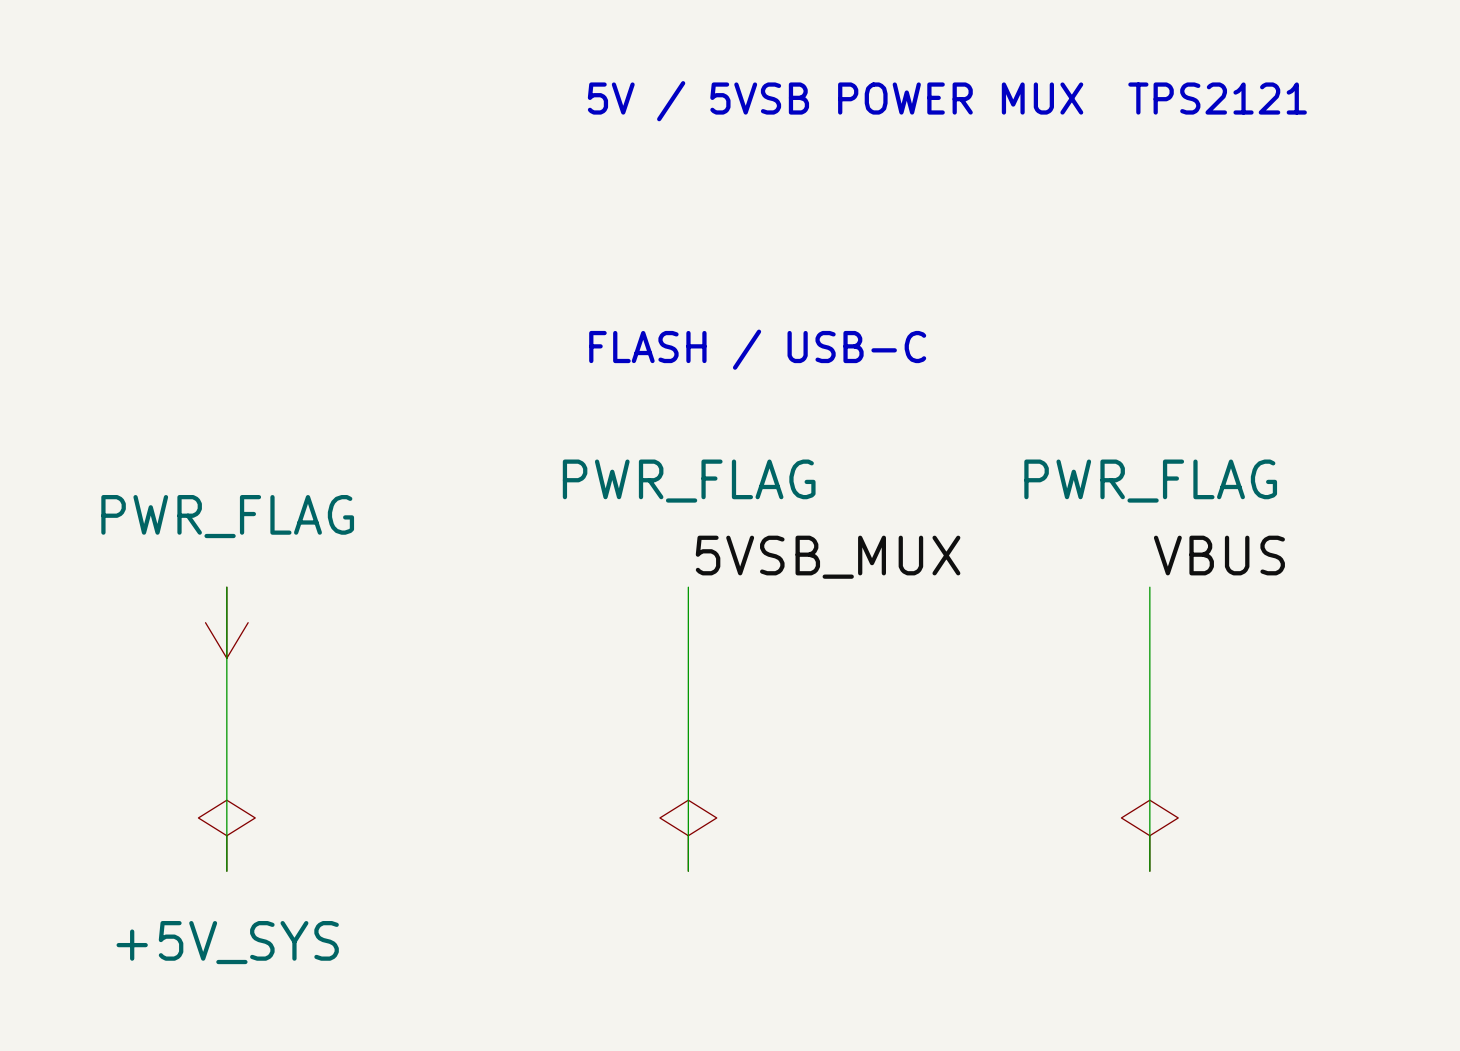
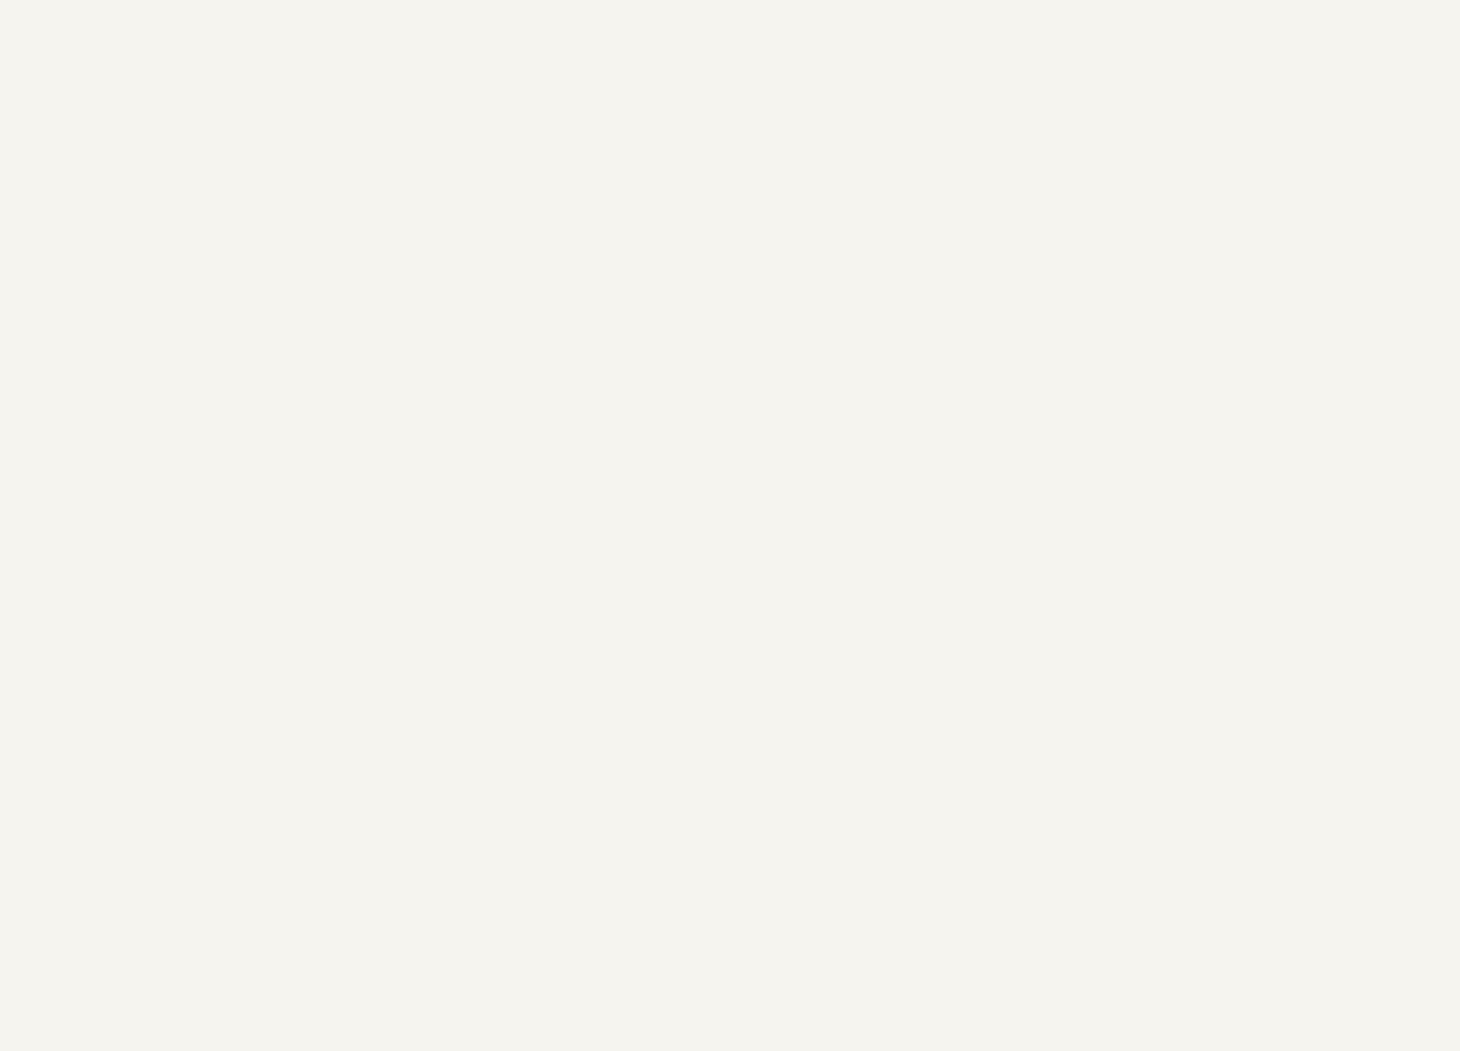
text: 5V / 5VSB POWER MUX TPS2121 (947, 101) -> none
text: FLASH / USB-C (757, 349) -> none
label: VBUS (1219, 555) -> none
label: 5VSB_MUX (828, 557) -> none
wire: (226, 587) (226, 871) -> none
wire: (688, 587) (688, 871) -> none
wire: (1149, 587) (1149, 871) -> none
power symbol: +5V_SYS (226, 622) -> none
power symbol: PWR_FLAG (226, 835) -> none
power symbol: PWR_FLAG (688, 835) -> none
power symbol: PWR_FLAG (1149, 835) -> none

